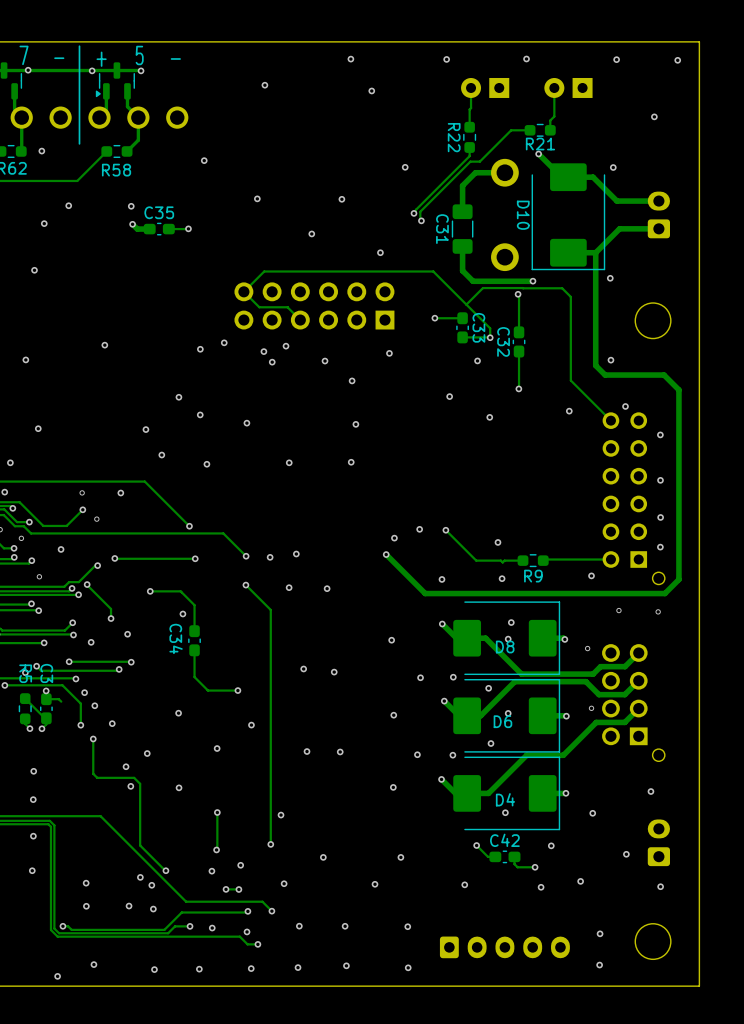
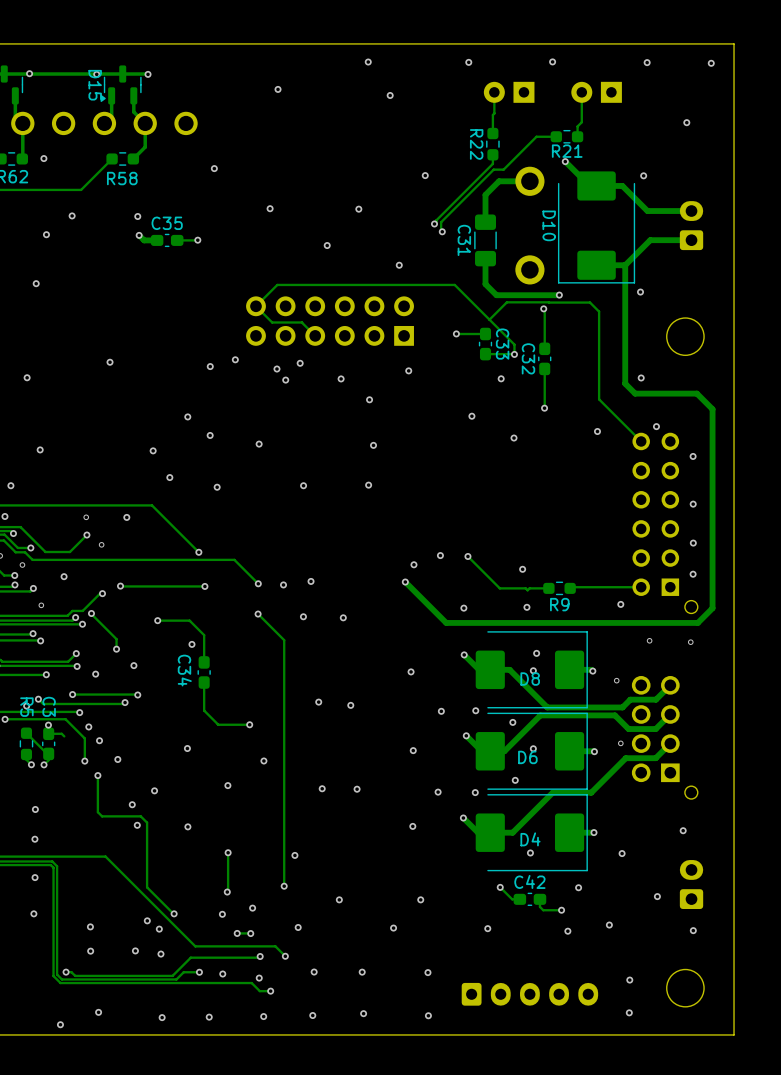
line: (79, 46) (79, 143) -> none
text: 7 (24, 55) -> none
text: 5 (139, 55) -> none
text: - (59, 58) -> none
text: - (175, 58) -> none
text: + (101, 59) -> none
D15 name: none -> D15 (95, 85)

